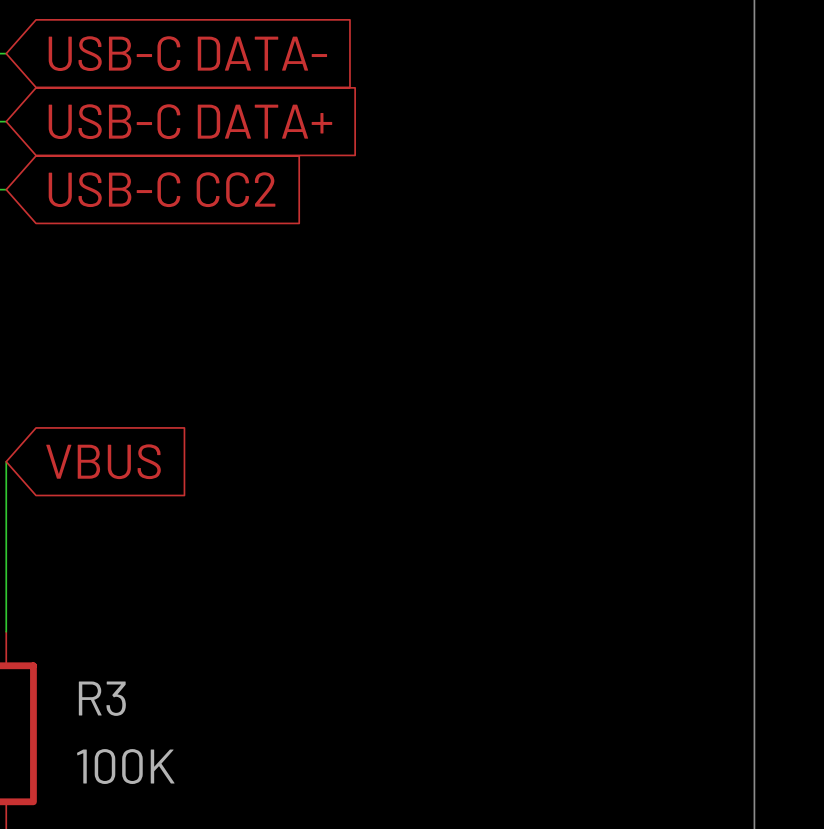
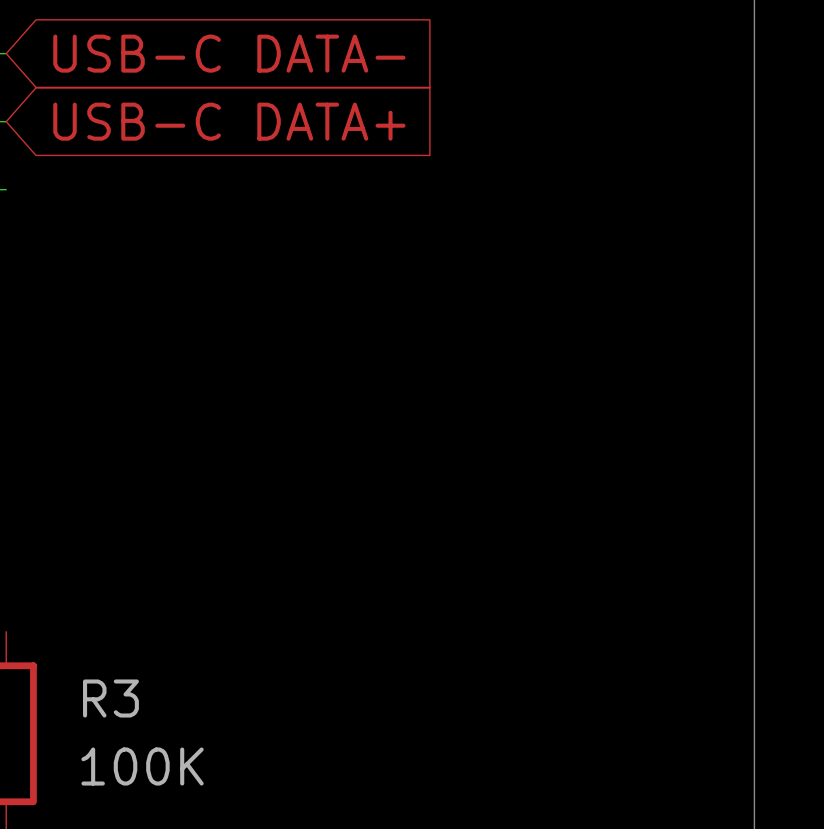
global label: USB-C CC2 (162, 189) -> none
wire: (6, 461) (6, 631) -> none
global label: VBUS (103, 461) -> none

